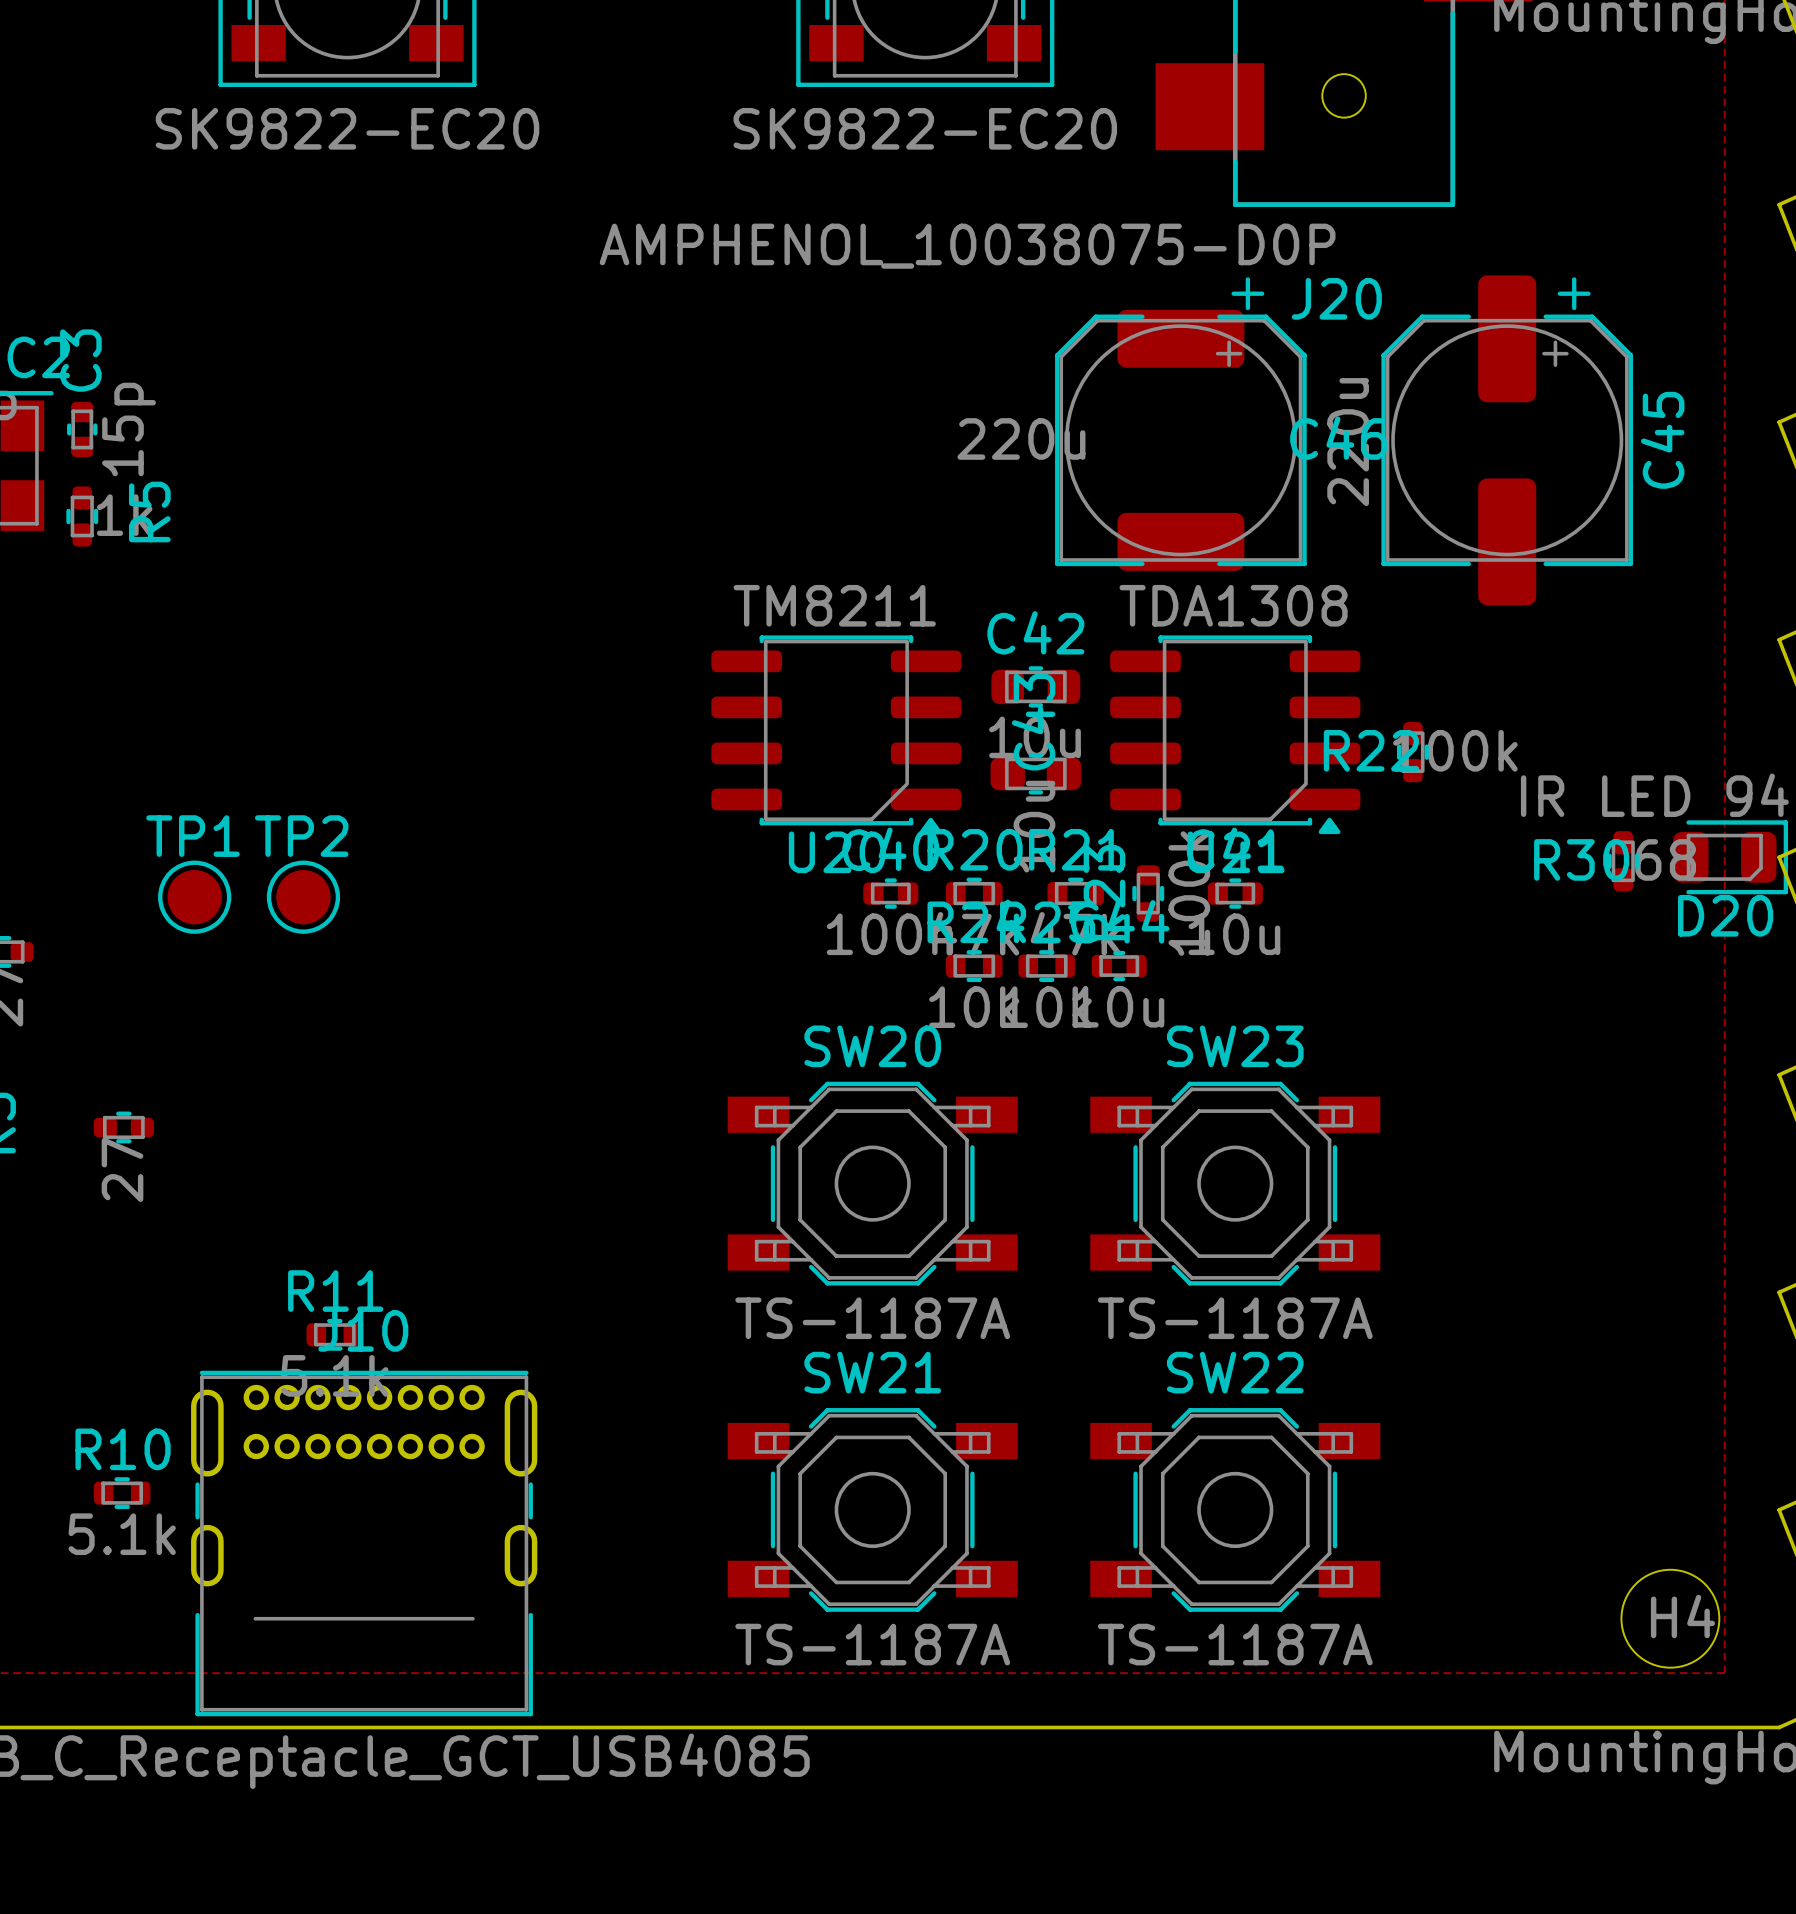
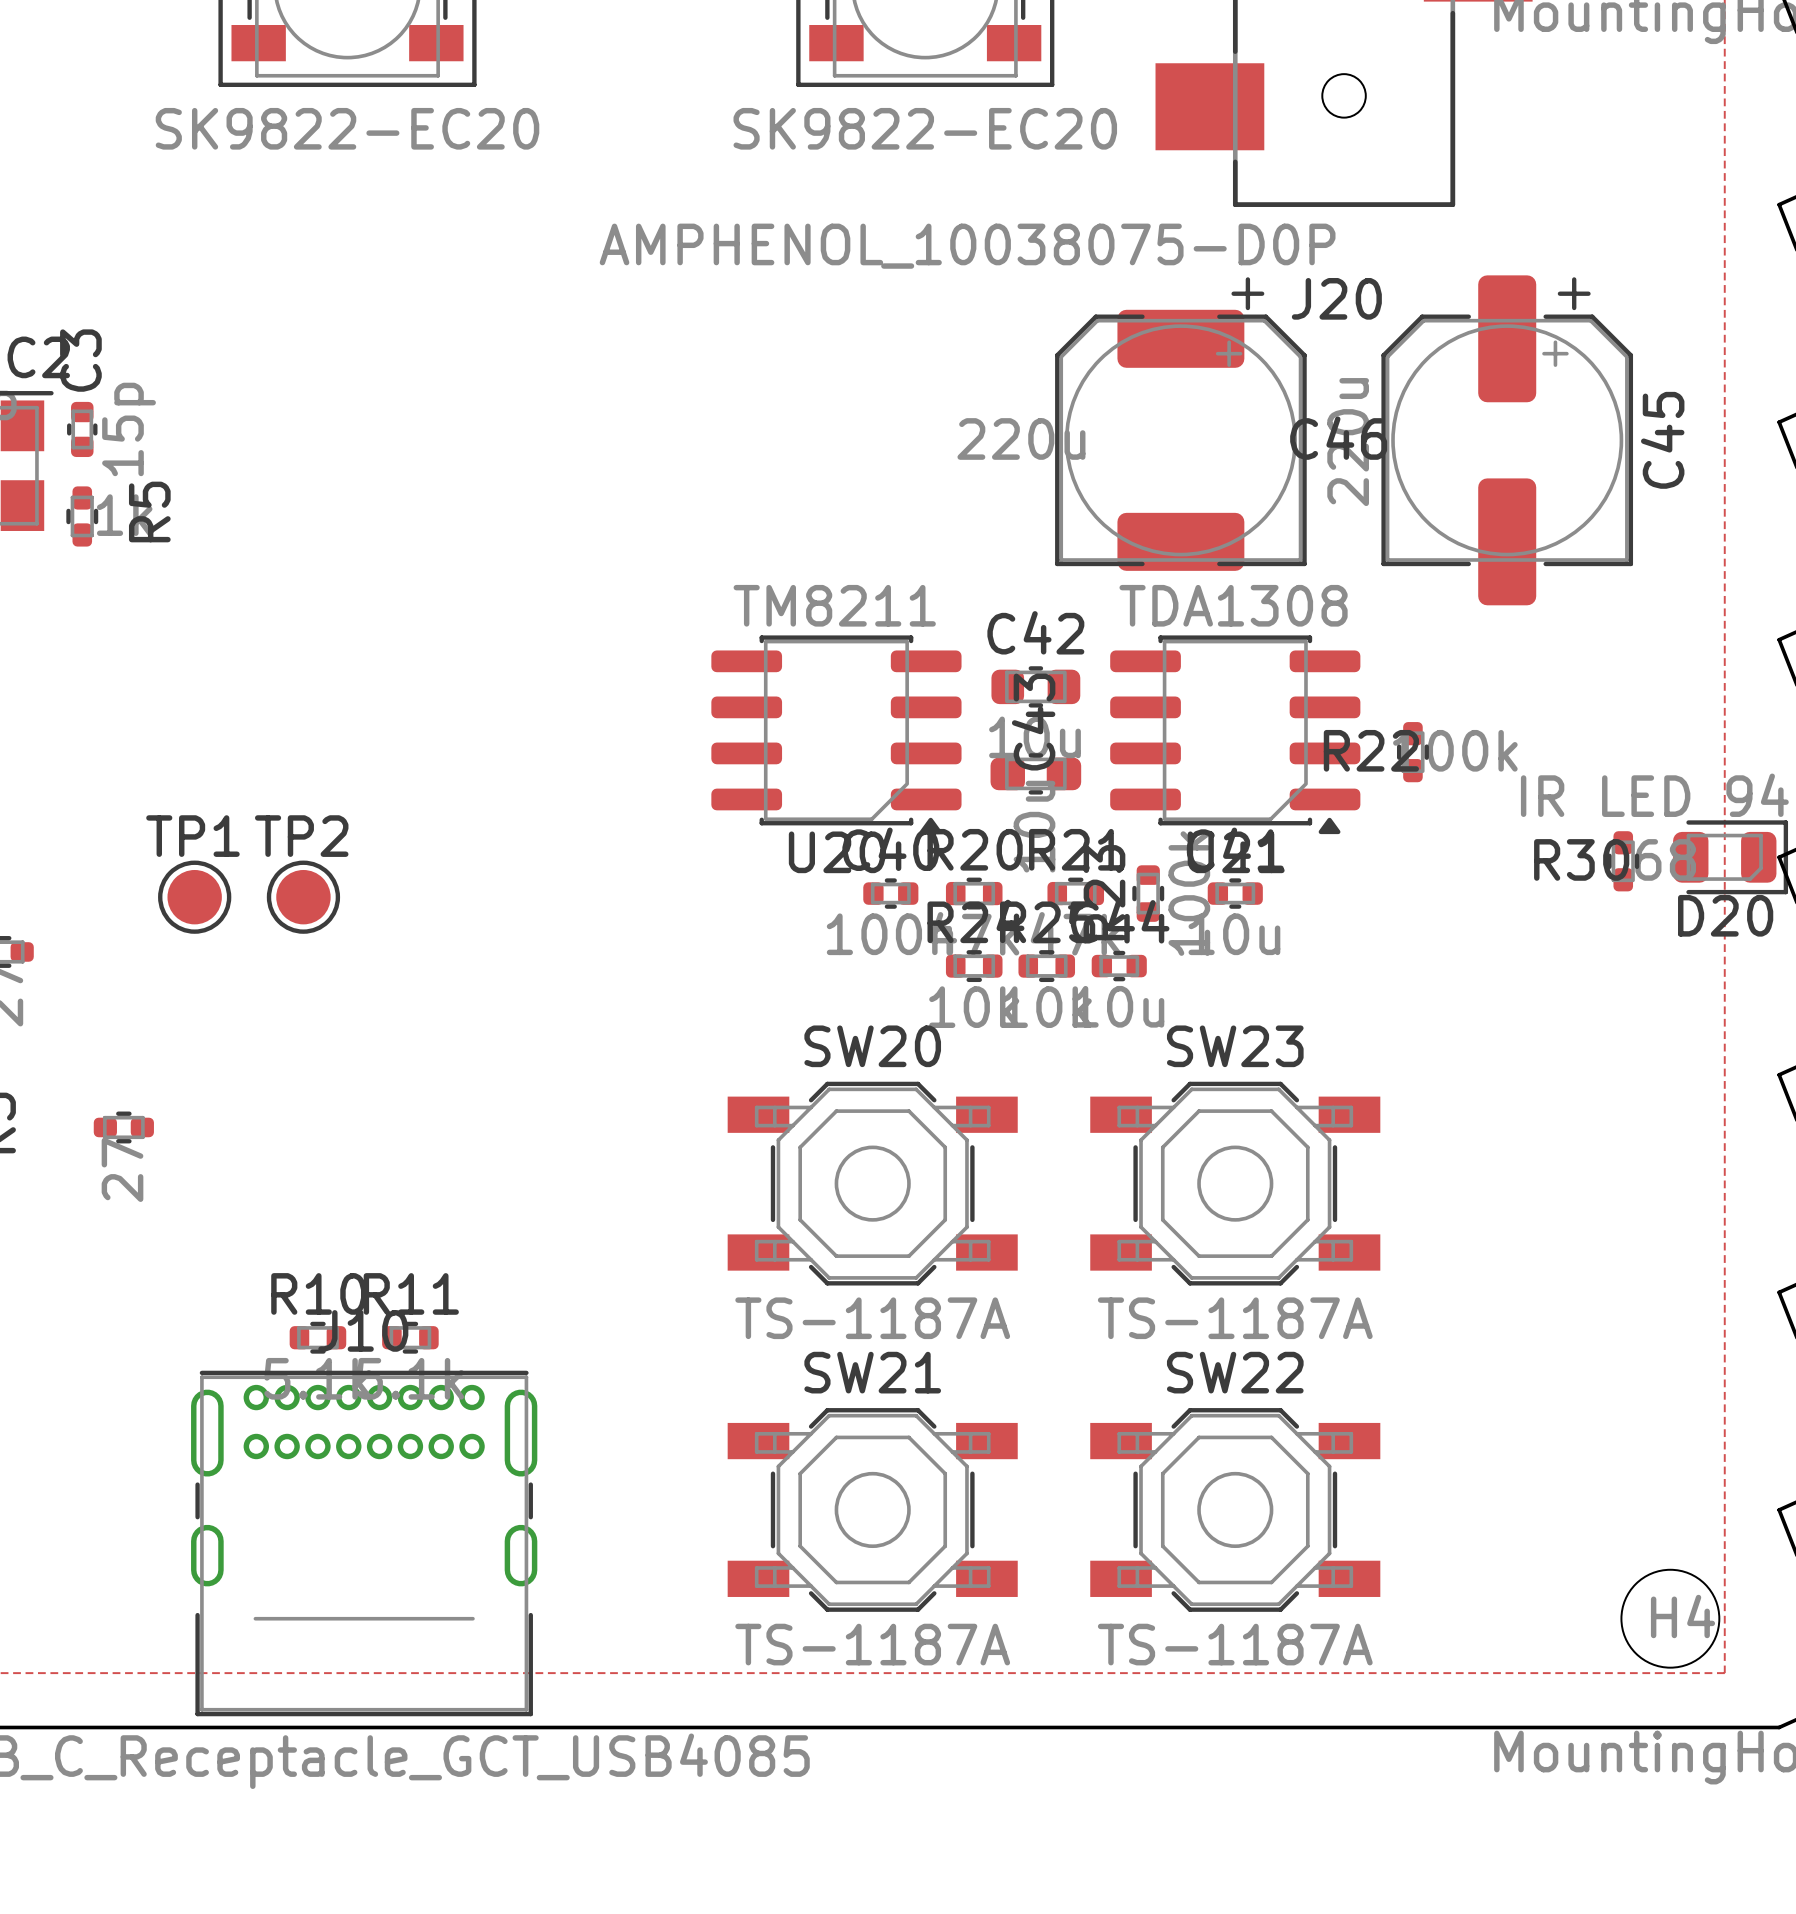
R11 position: (334, 1334) -> (410, 1337)
R10 position: (122, 1493) -> (317, 1337)

